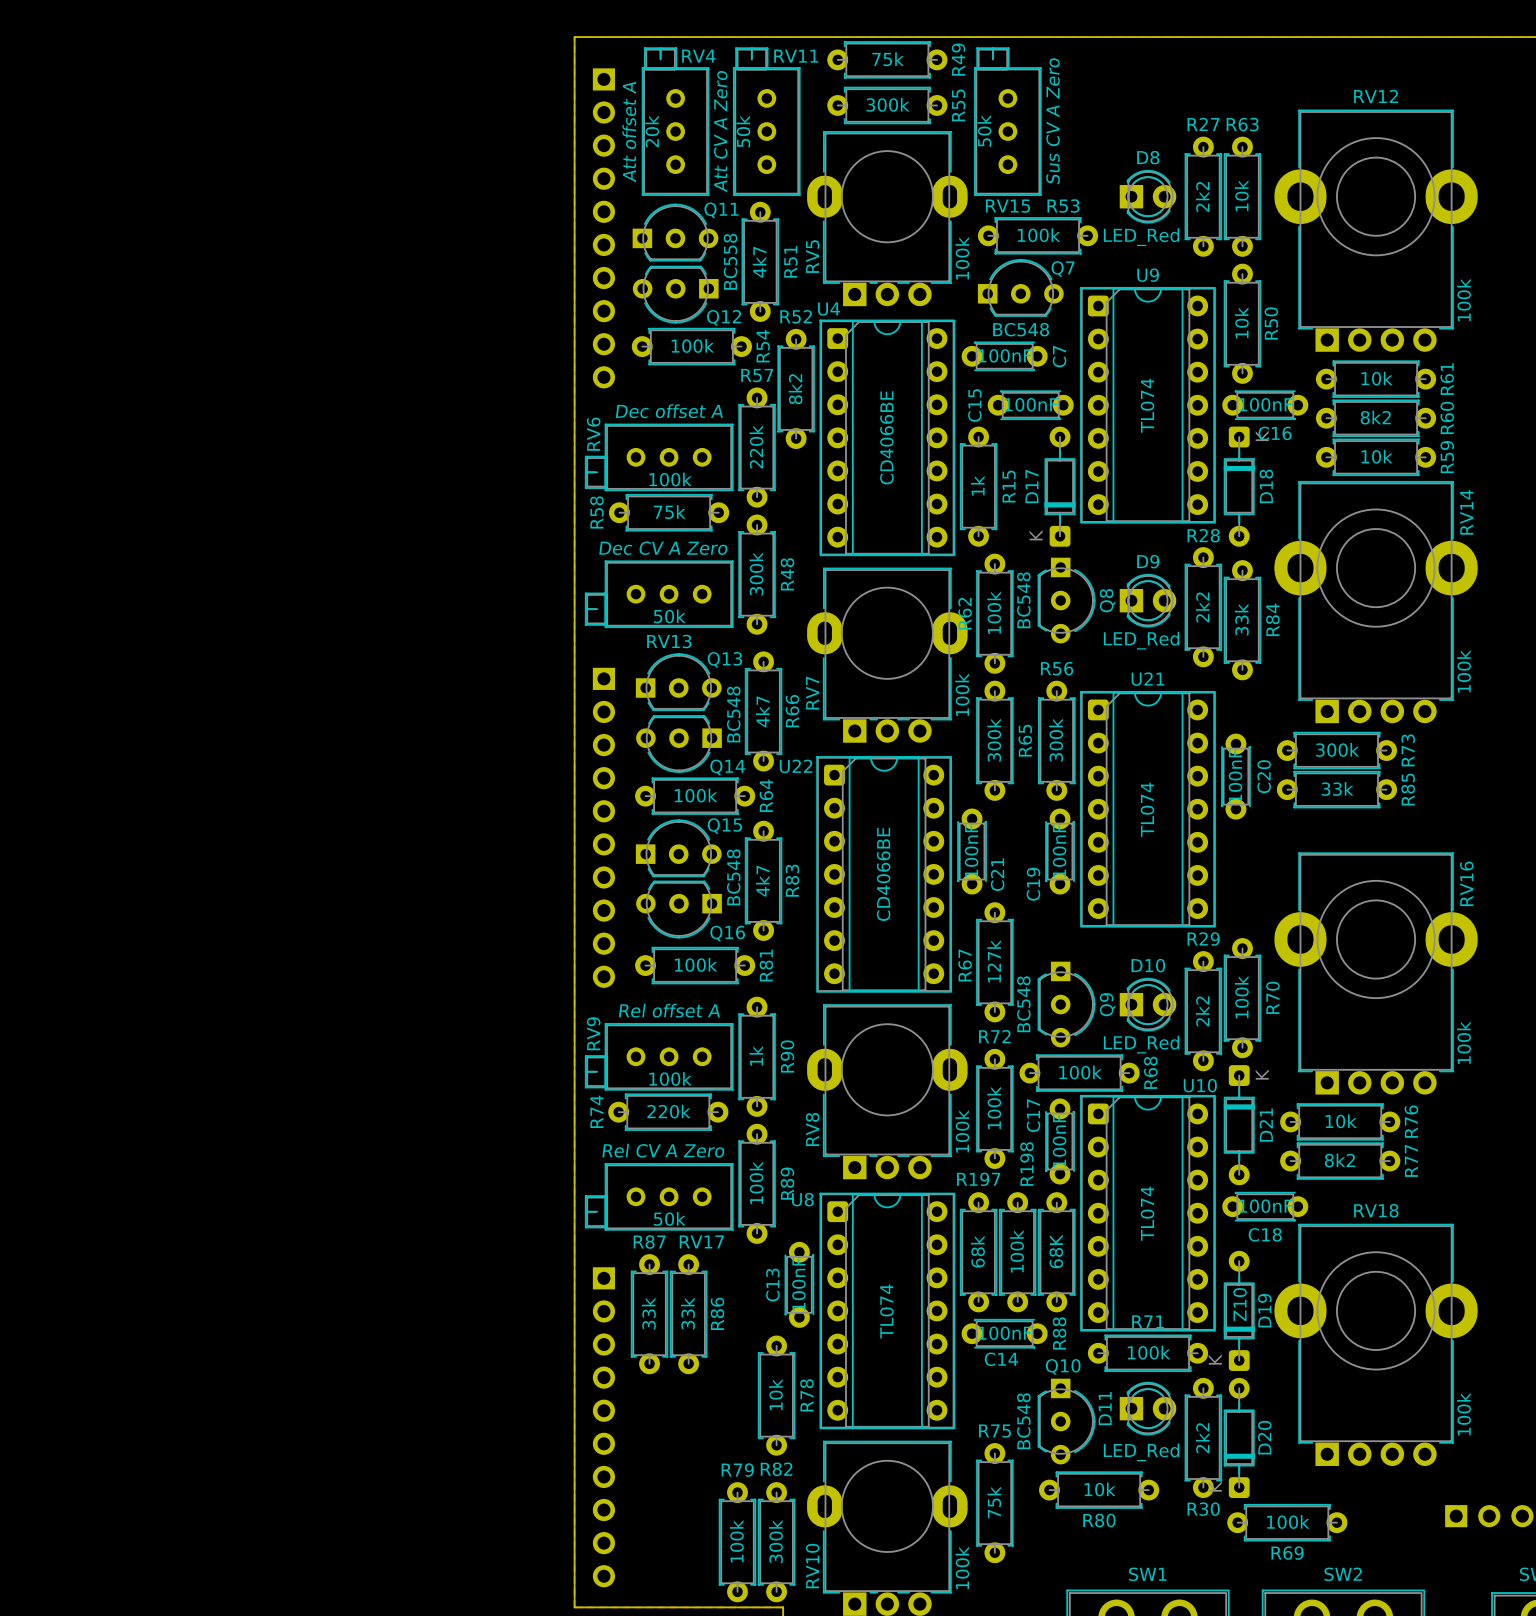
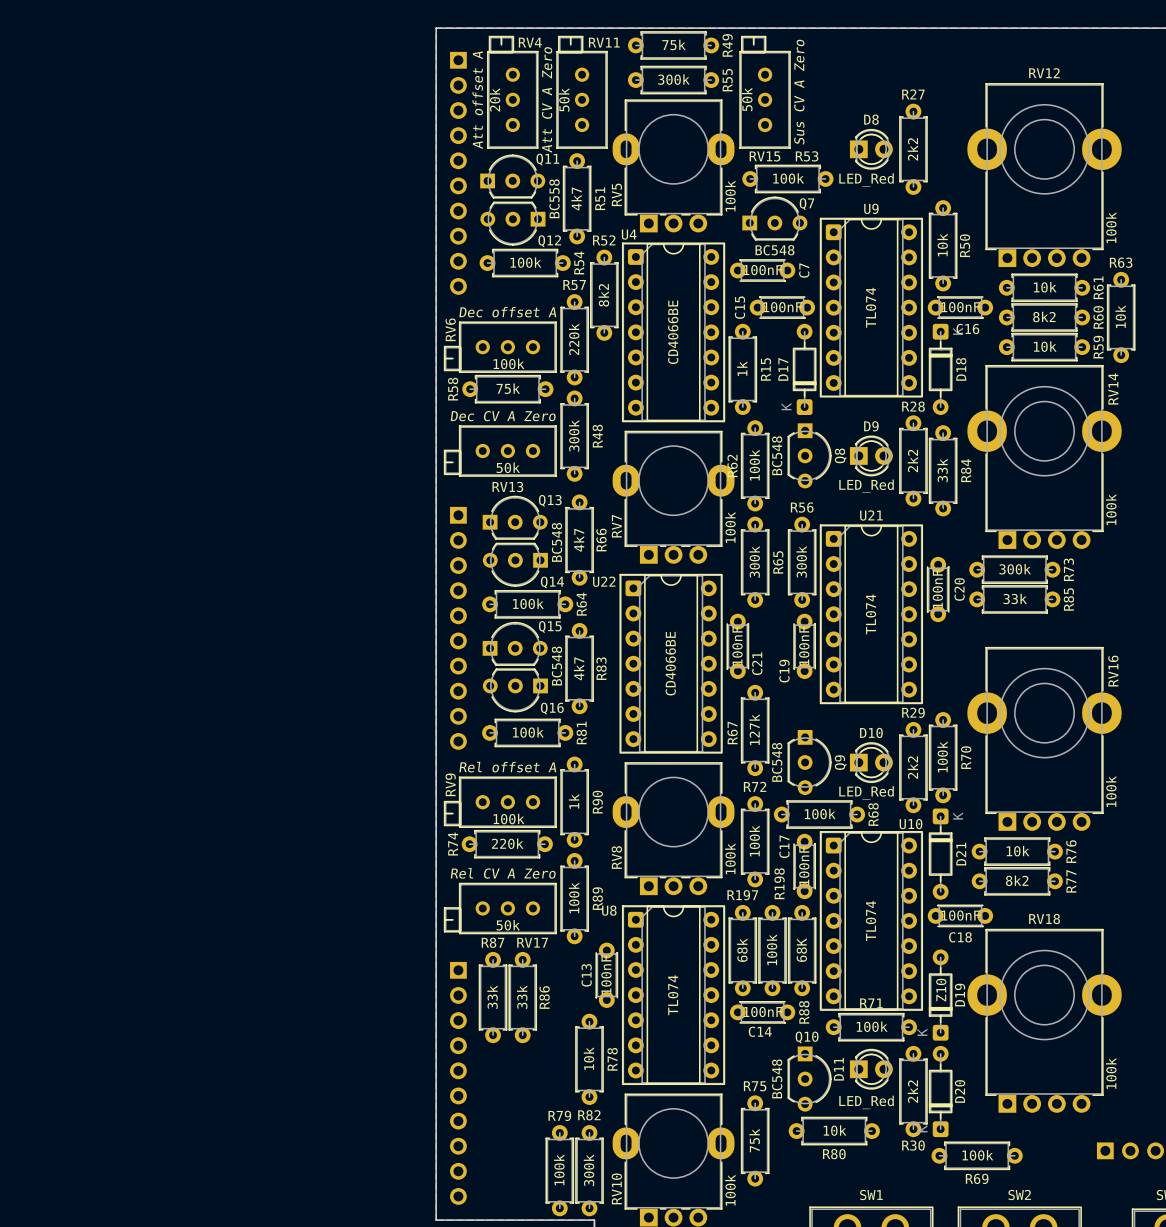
R63 position: (1242, 196) -> (1121, 317)

